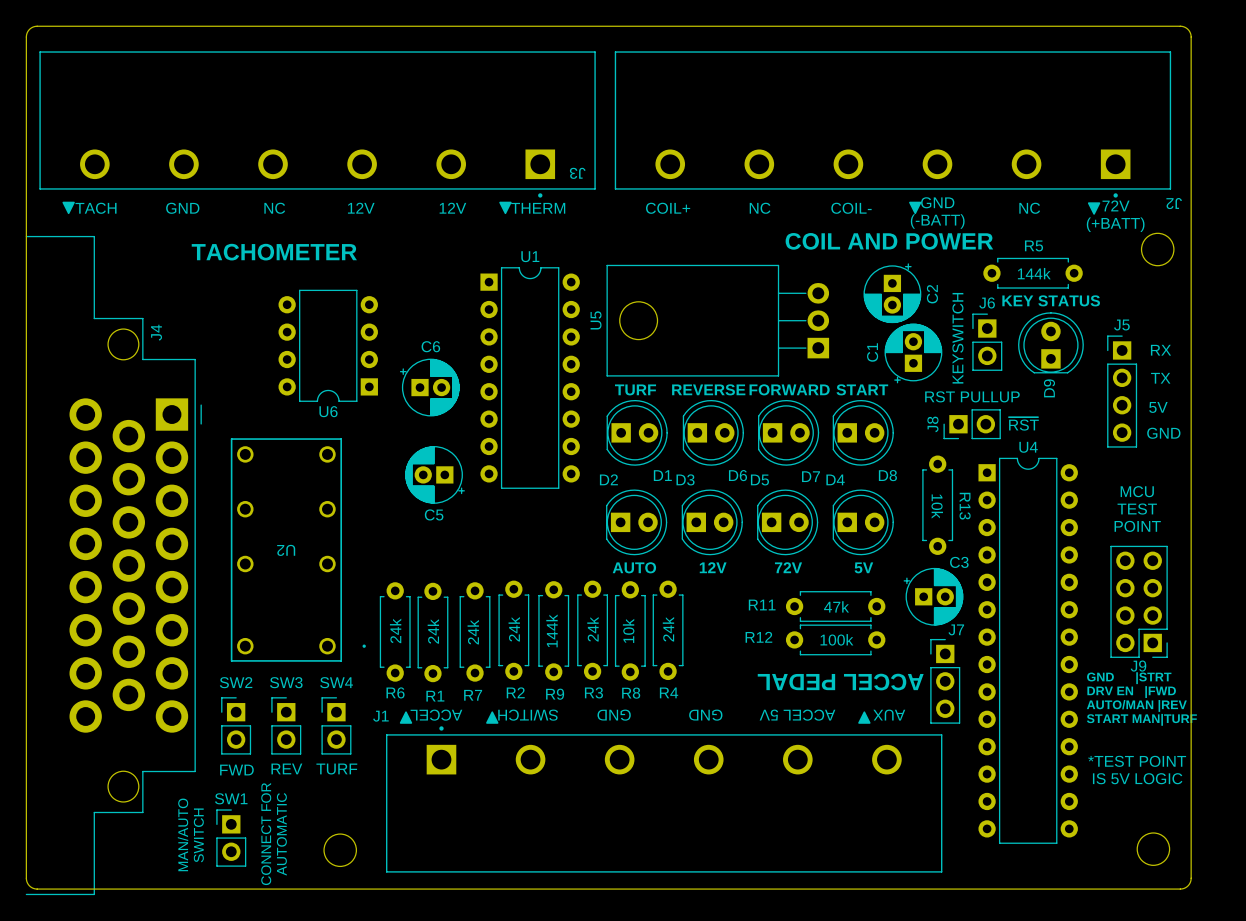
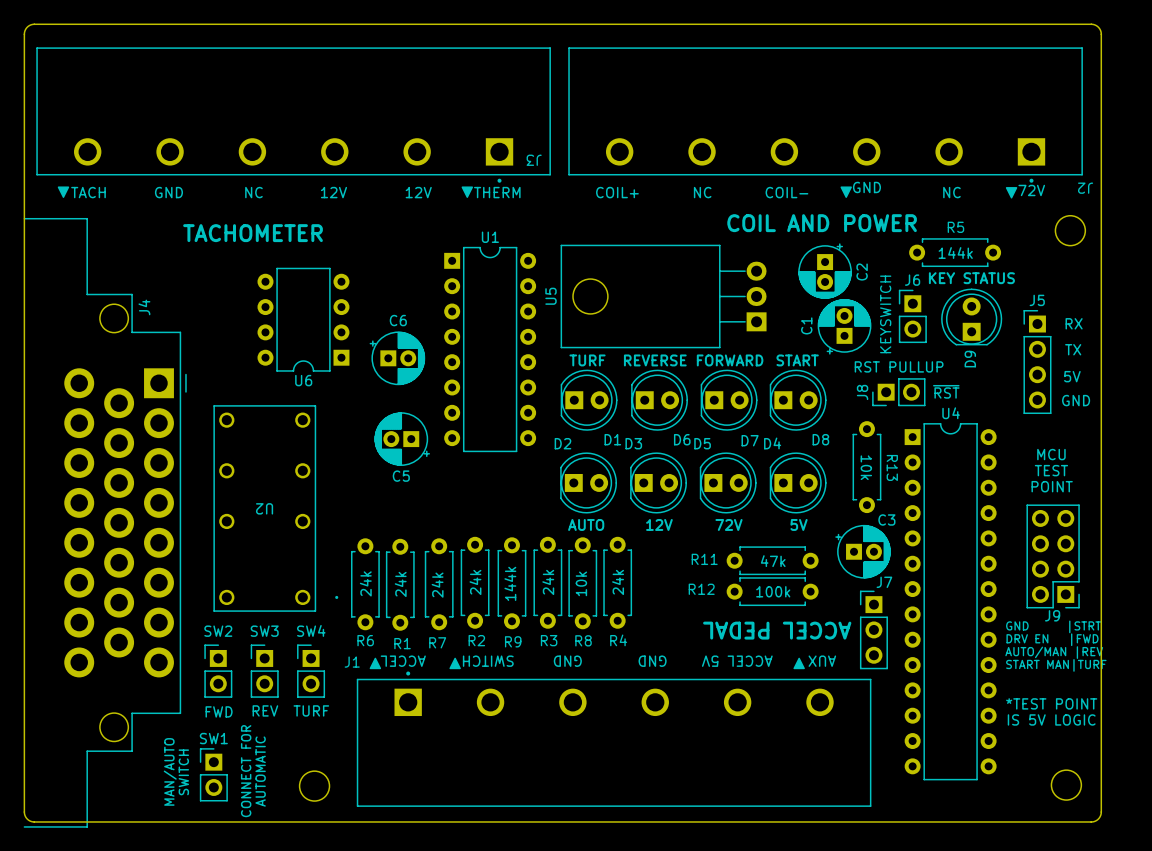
text: (-BATT) (937, 221) -> none
text: (+BATT) (1115, 224) -> none

